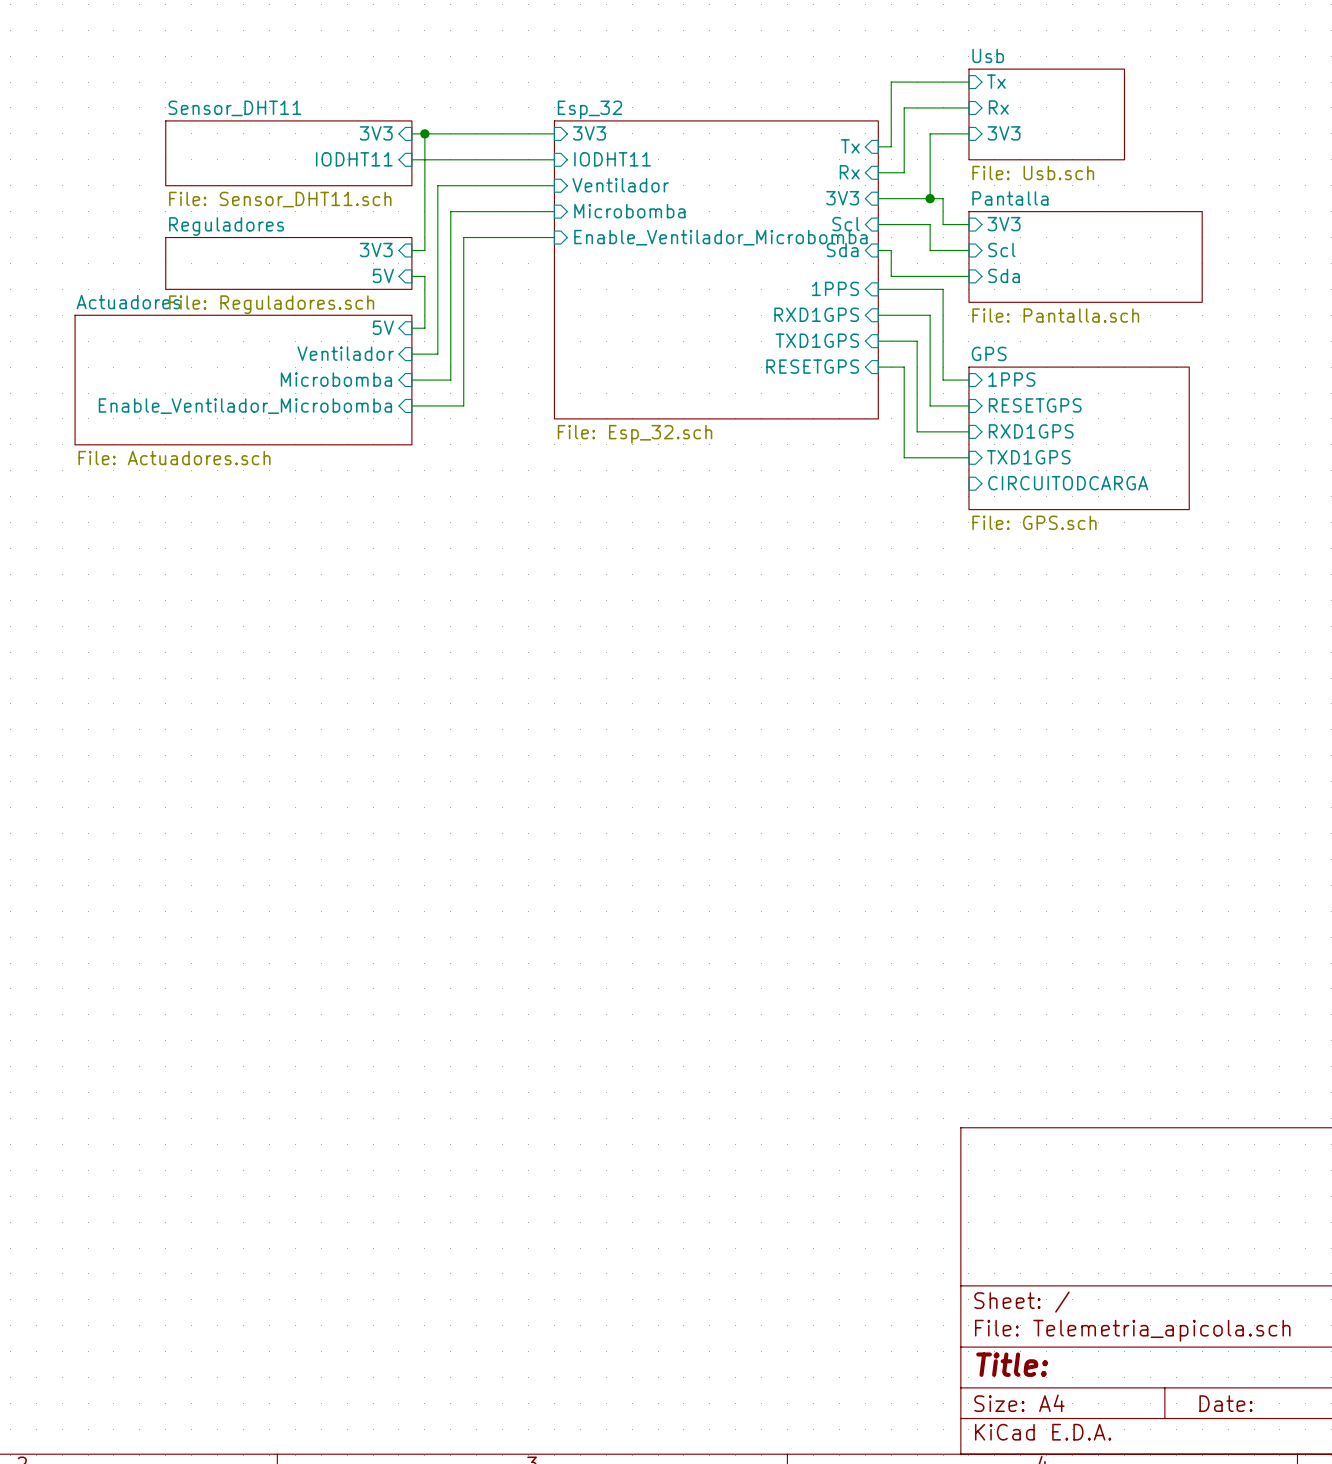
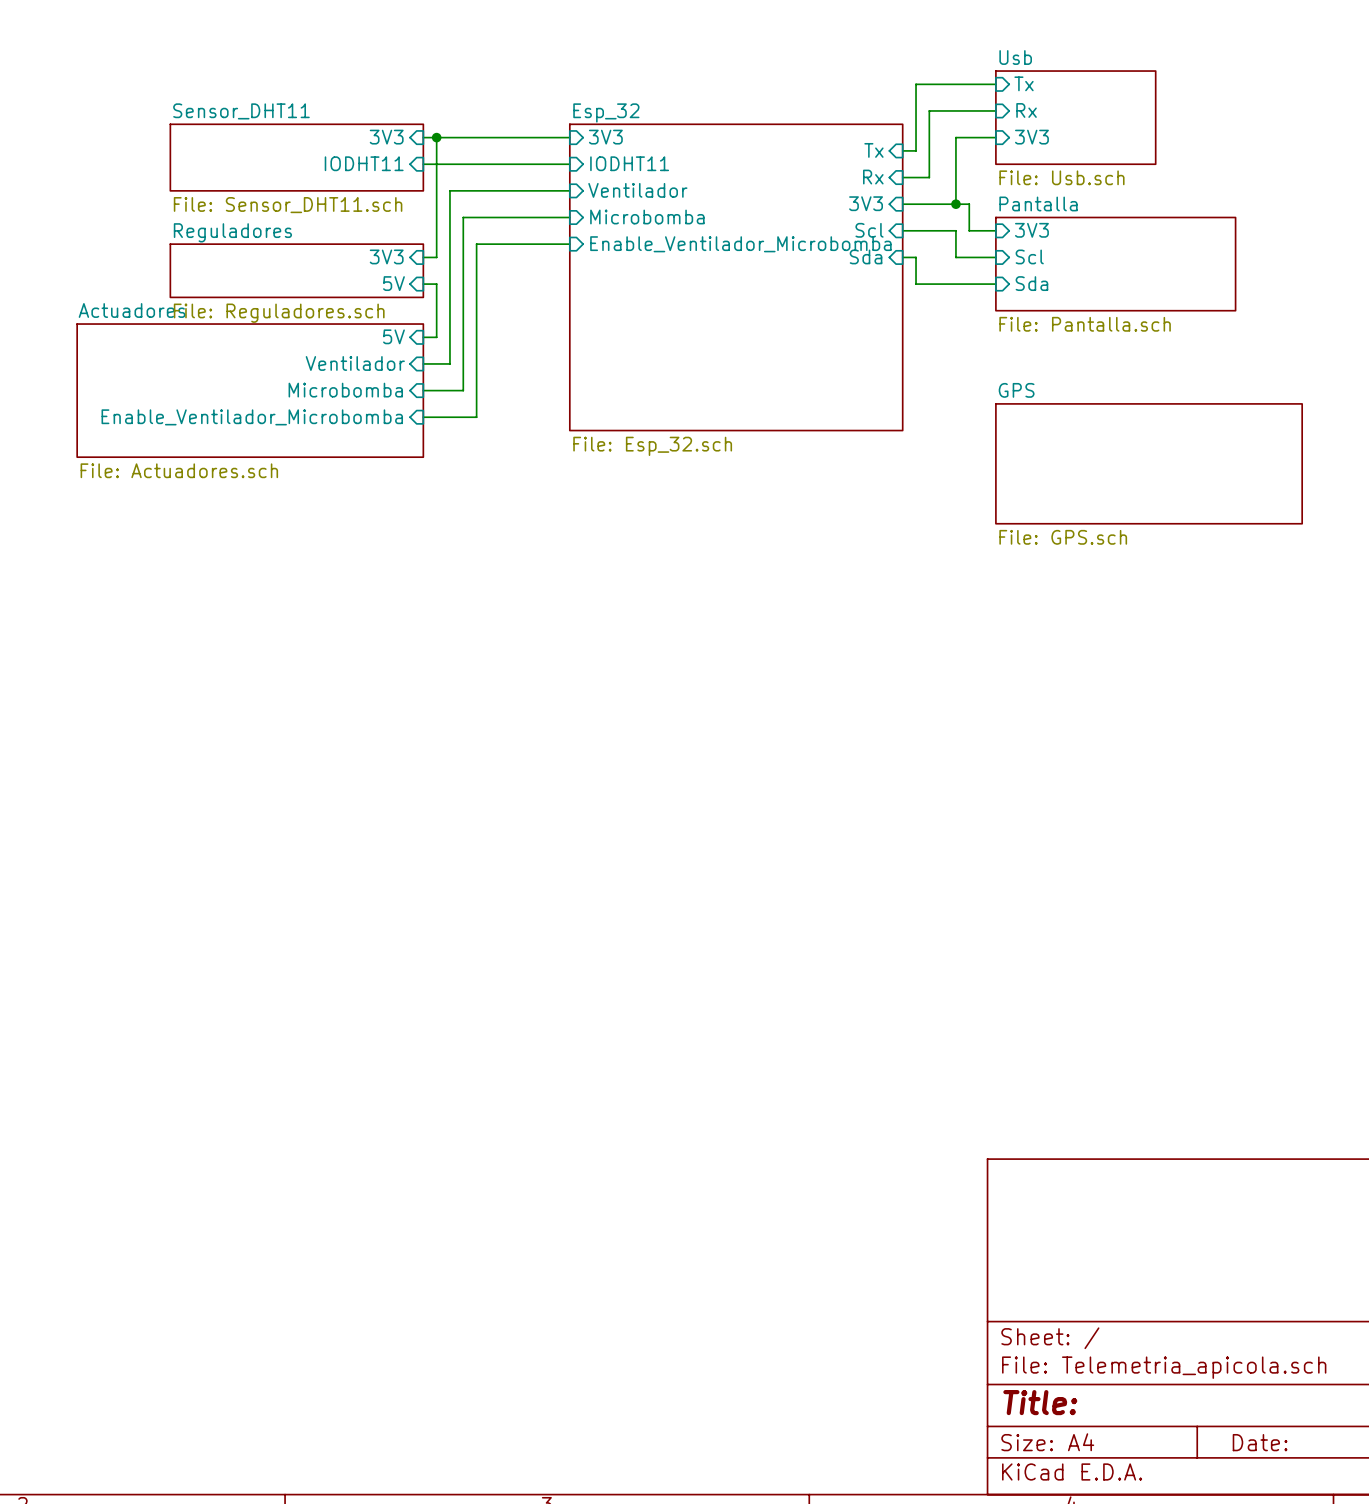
sheet pin: 1PPS (835, 288) -> none
wire: (878, 289) (943, 289) (943, 380) (968, 380) -> none
sheet pin: RXD1GPS (816, 314) -> none
wire: (878, 315) (930, 315) (930, 405) (968, 405) -> none
sheet pin: TXD1GPS (817, 340) -> none
wire: (878, 341) (917, 341) (917, 431) (968, 431) -> none
sheet pin: RESETGPS (812, 366) -> none
wire: (878, 367) (904, 367) (904, 457) (968, 457) -> none
sheet pin: 1PPS (1011, 379) -> none
sheet pin: RESETGPS (1035, 405) -> none
sheet pin: RXD1GPS (1031, 431) -> none
sheet GPS: File: GPS.sch (1079, 438) -> none
sheet GPS: none -> File: GPS.sch (1149, 463)
sheet pin: TXD1GPS (1028, 457) -> none
sheet pin: CIRCUITODCARGA (1068, 483) -> none

